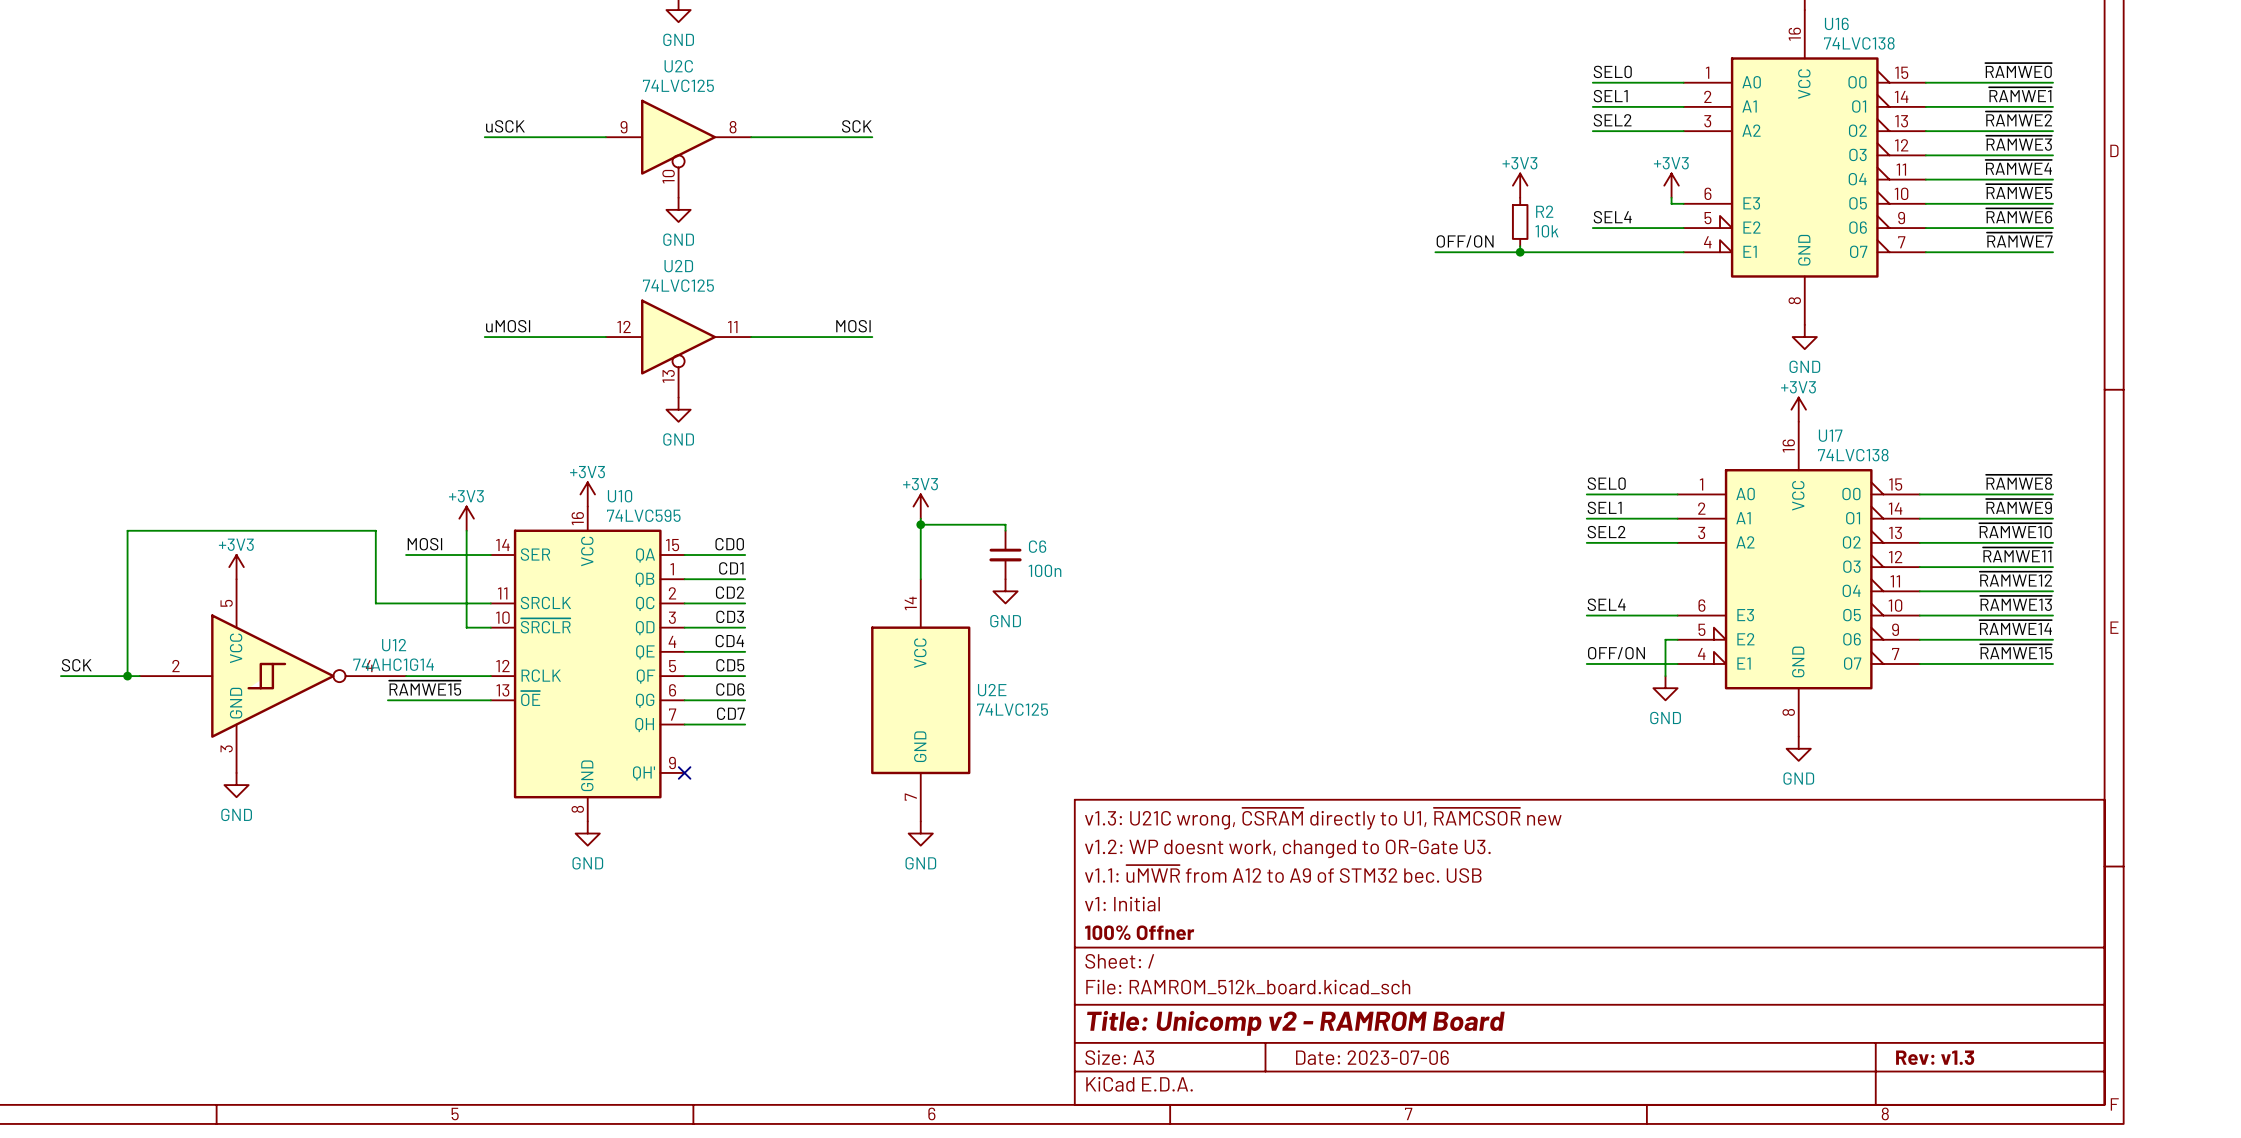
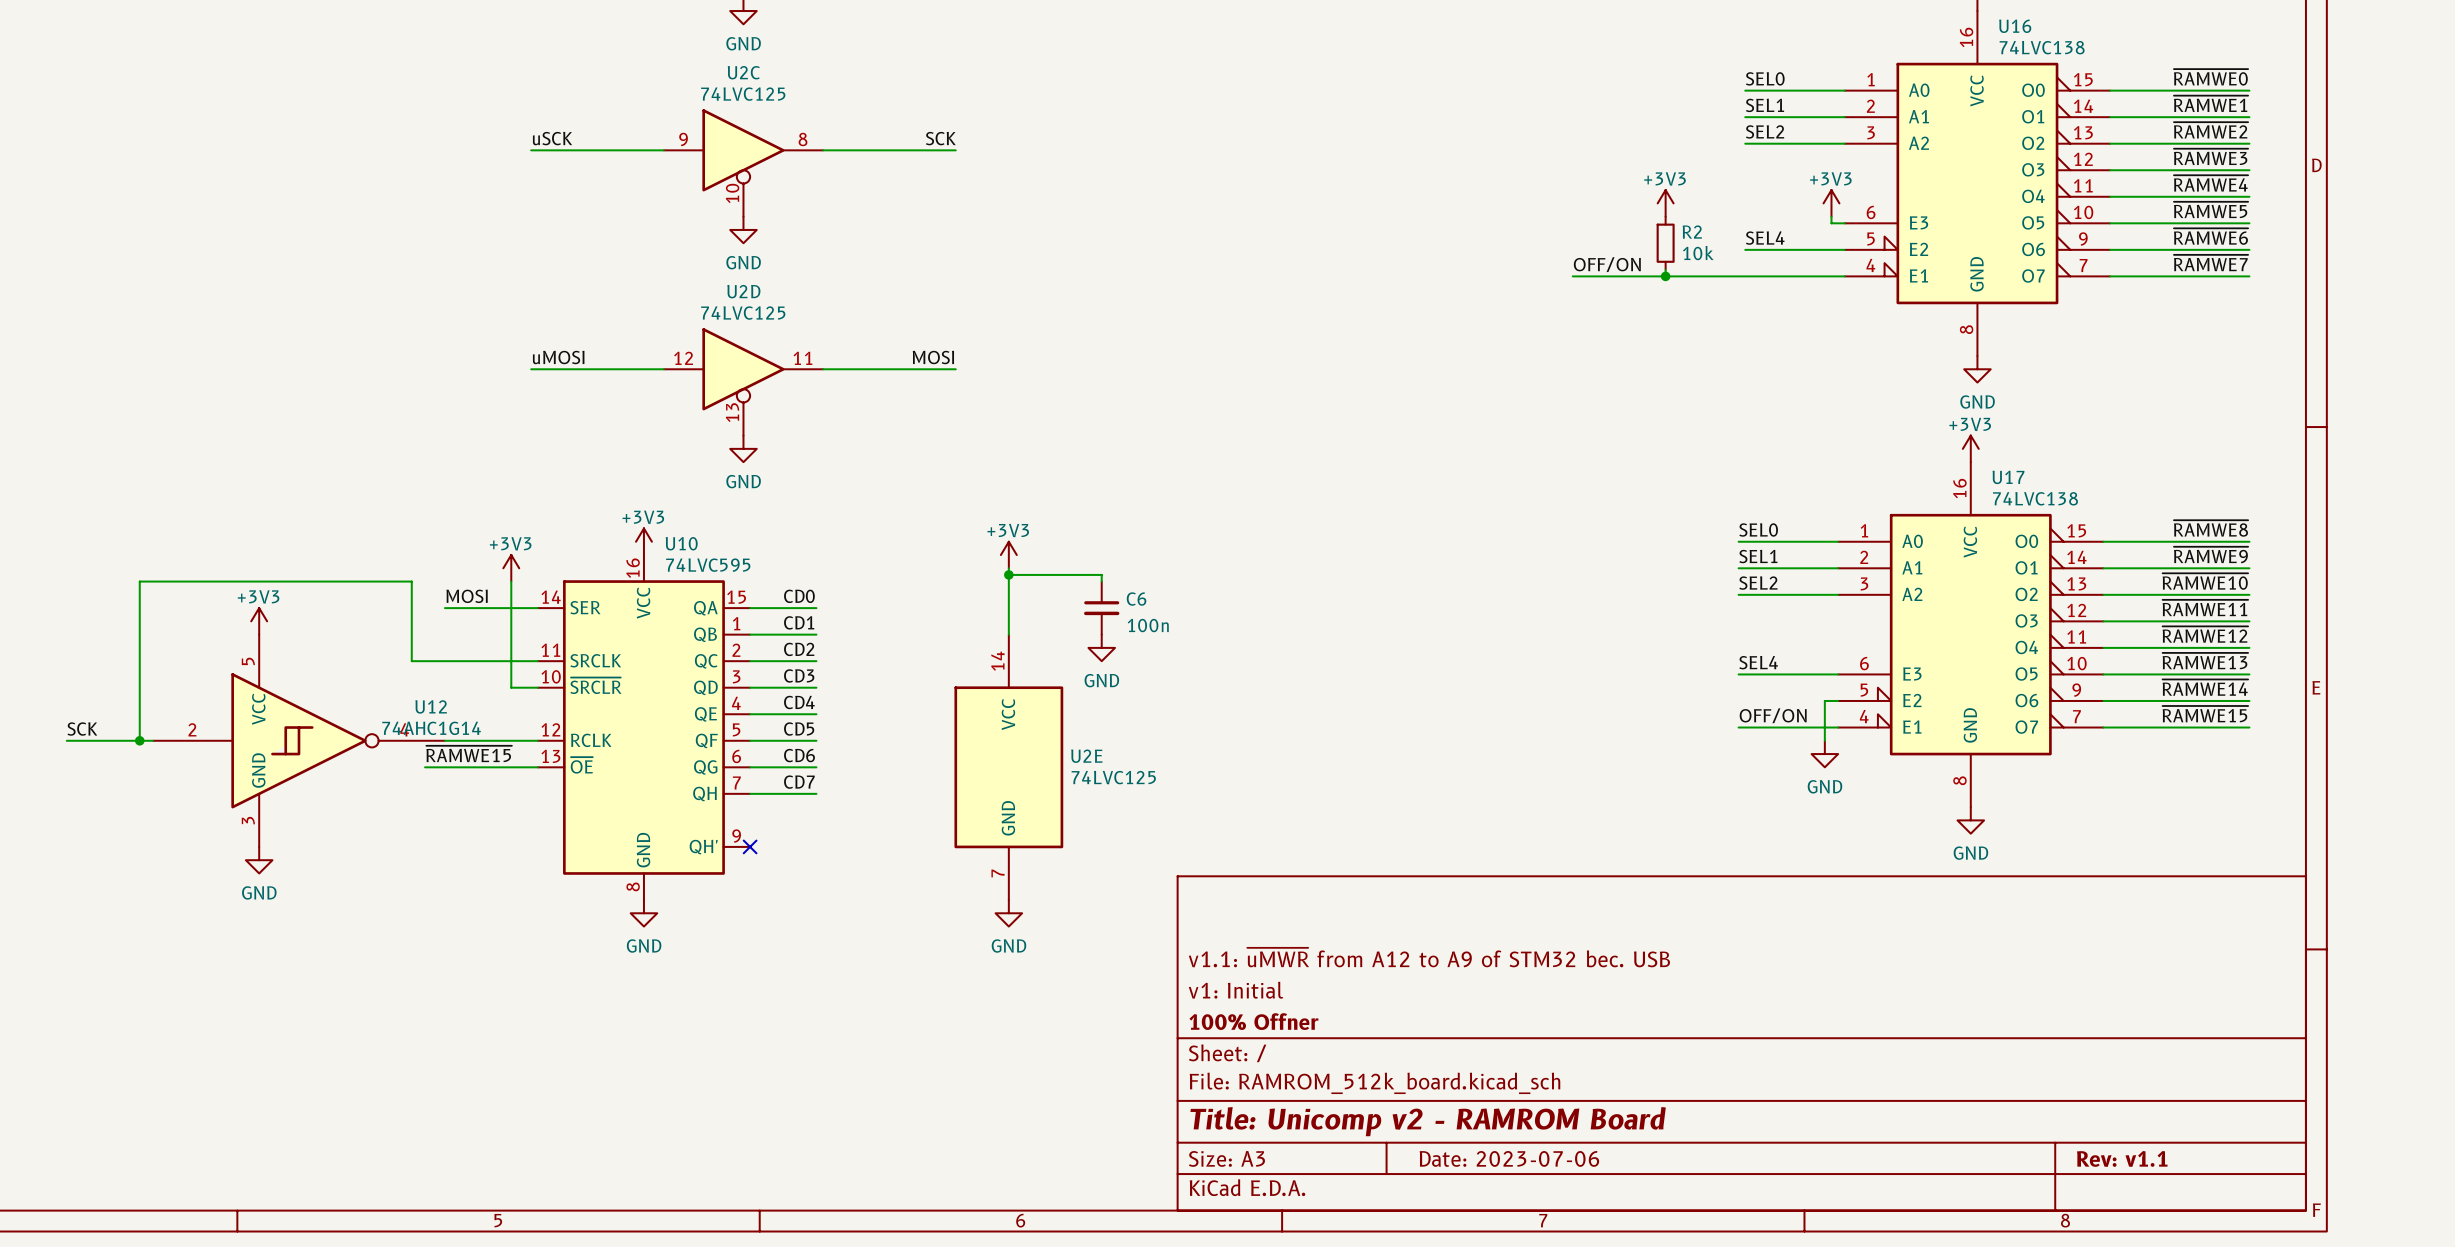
title block: v1.3: U21C wrong, ~{CSRAM} directly to U1, ~{RAMCSOR} new (1323, 818) -> none
title block: v1.2: WP doesnt work, changed to OR-Gate U3. (1287, 848) -> none
title block: Rev: v1.3 (1935, 1057) -> Rev: v1.1 (2122, 1158)

